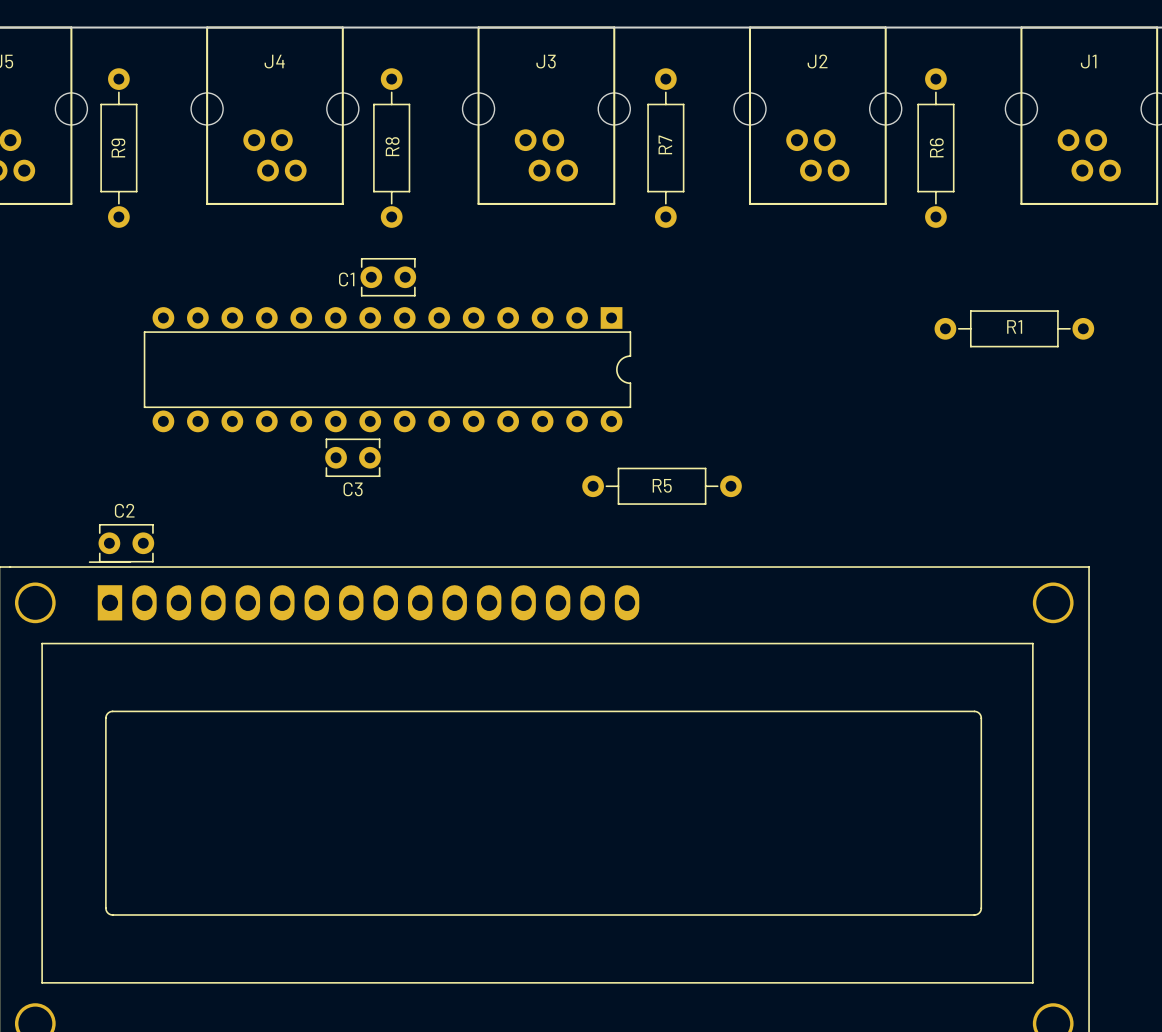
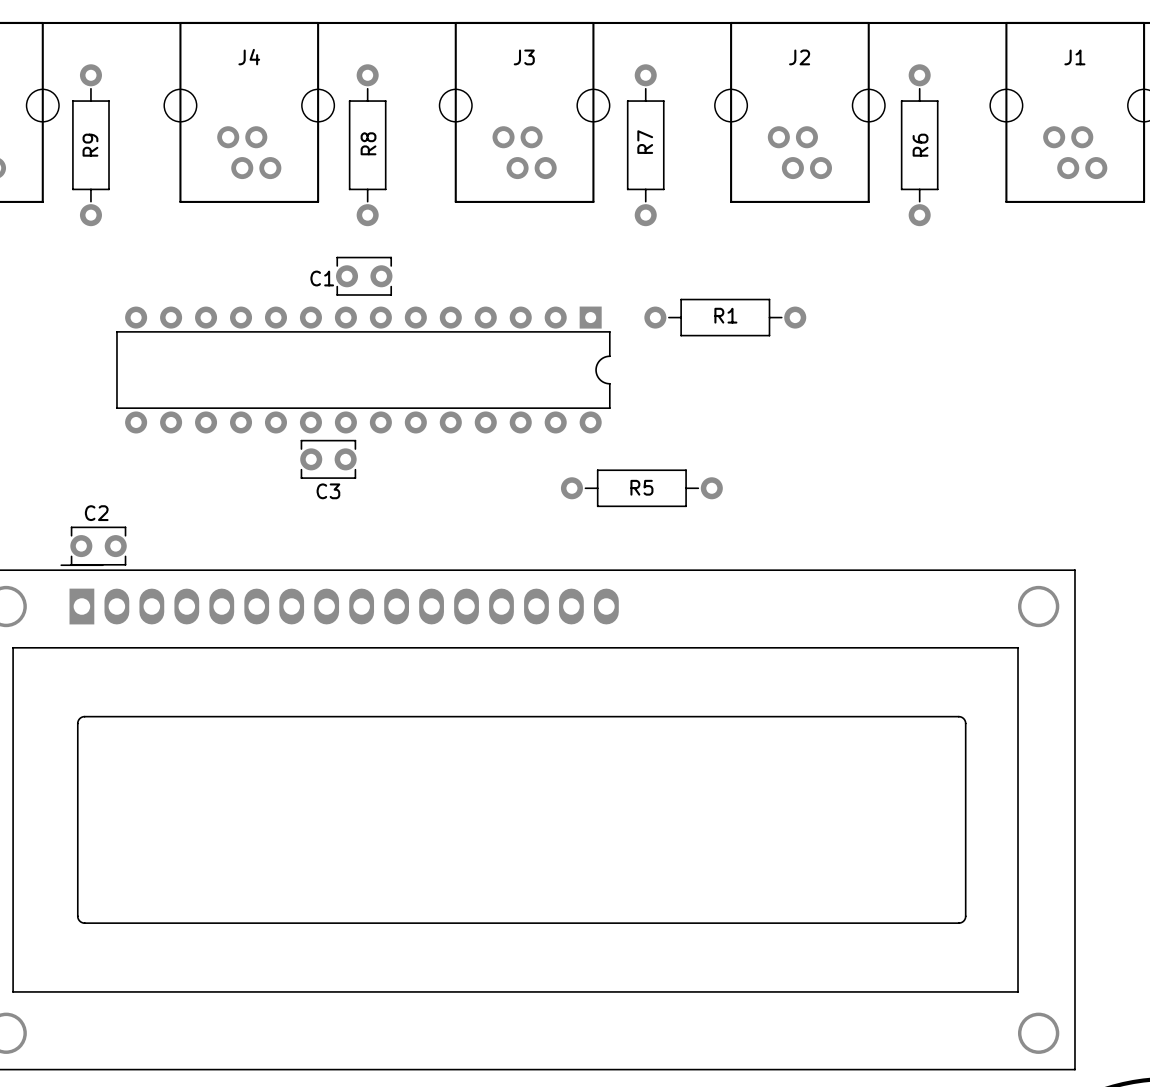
R1 position: (1014, 328) -> (725, 317)

